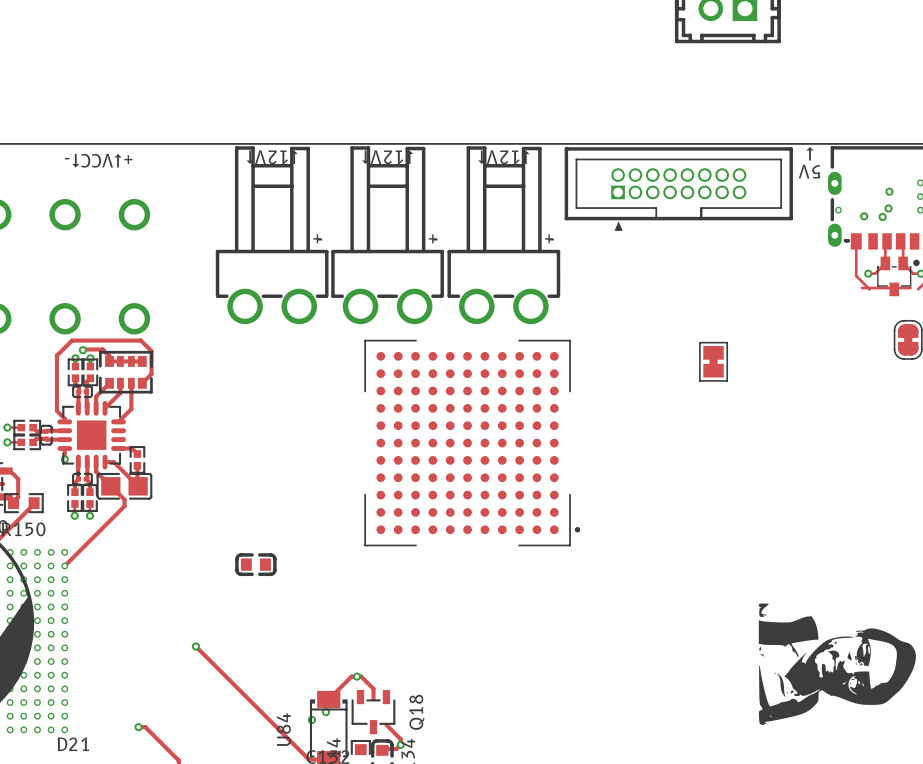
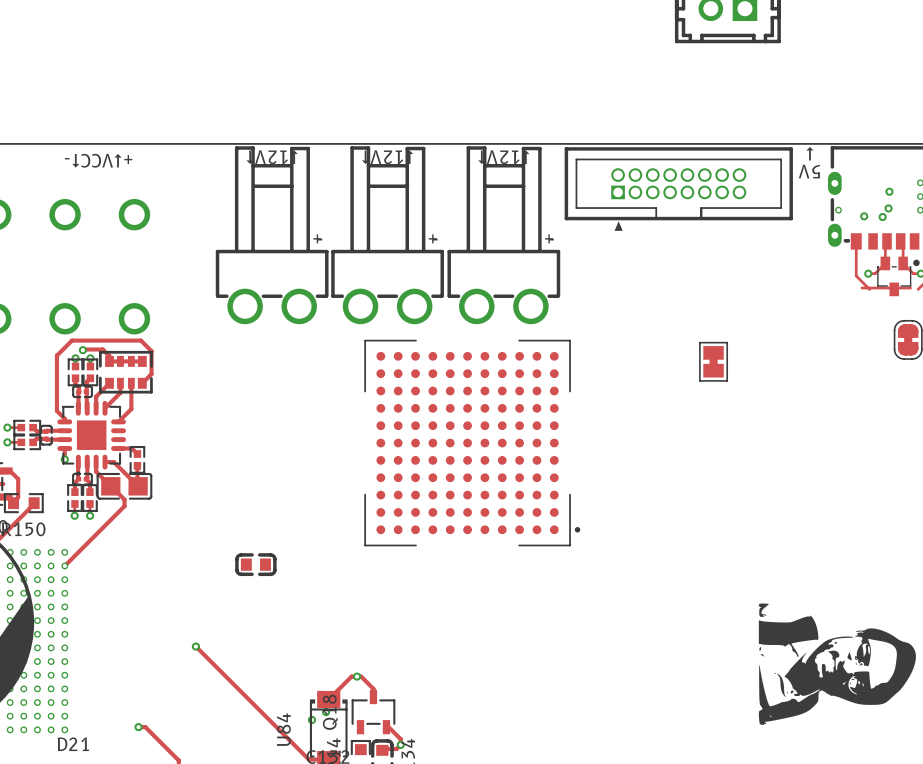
Q18 rotation: 0° (373, 712) -> 180° (373, 712)

